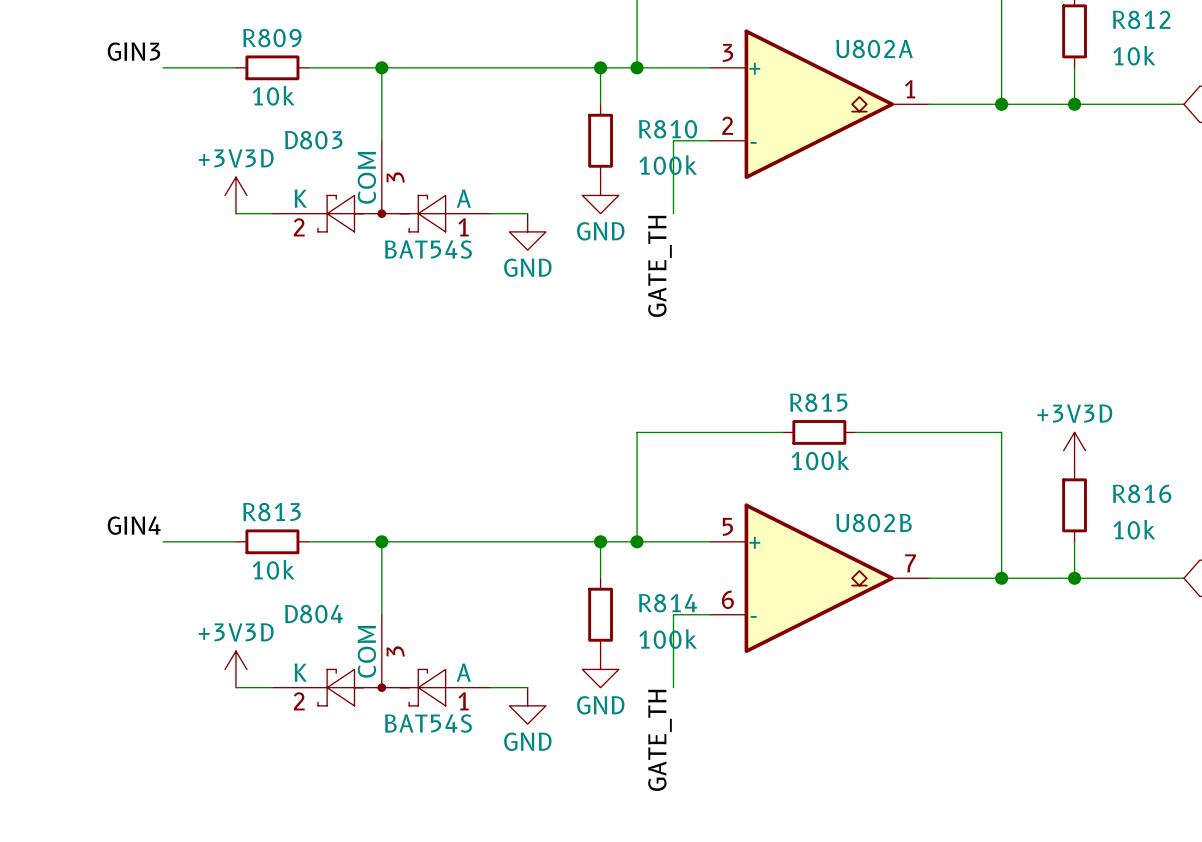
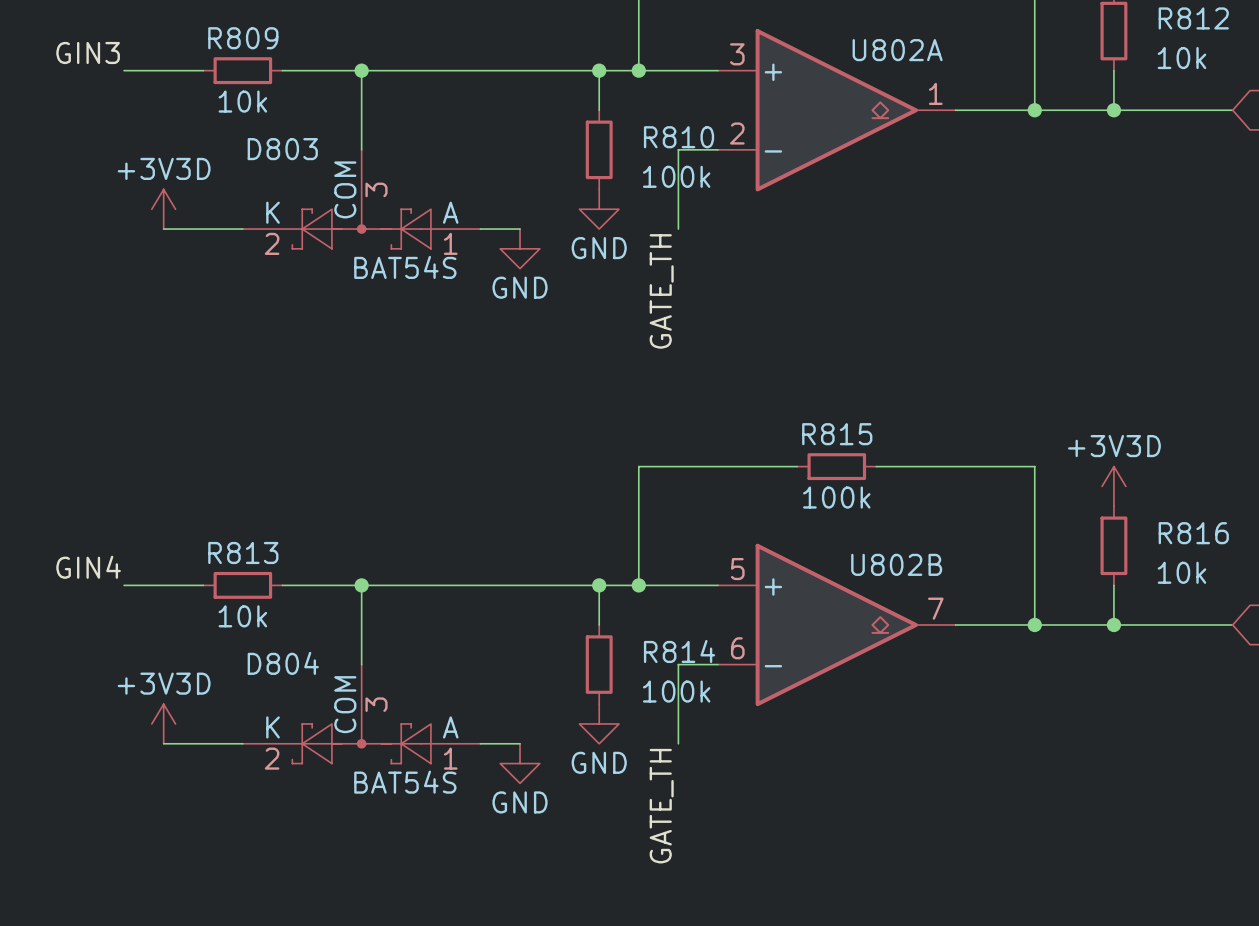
power symbol position: +3V3D (235, 195) -> +3V3D (163, 209)
wire: none -> (163, 229) (203, 229)
power symbol position: +3V3D (235, 669) -> +3V3D (163, 723)
wire: none -> (163, 743) (203, 743)

